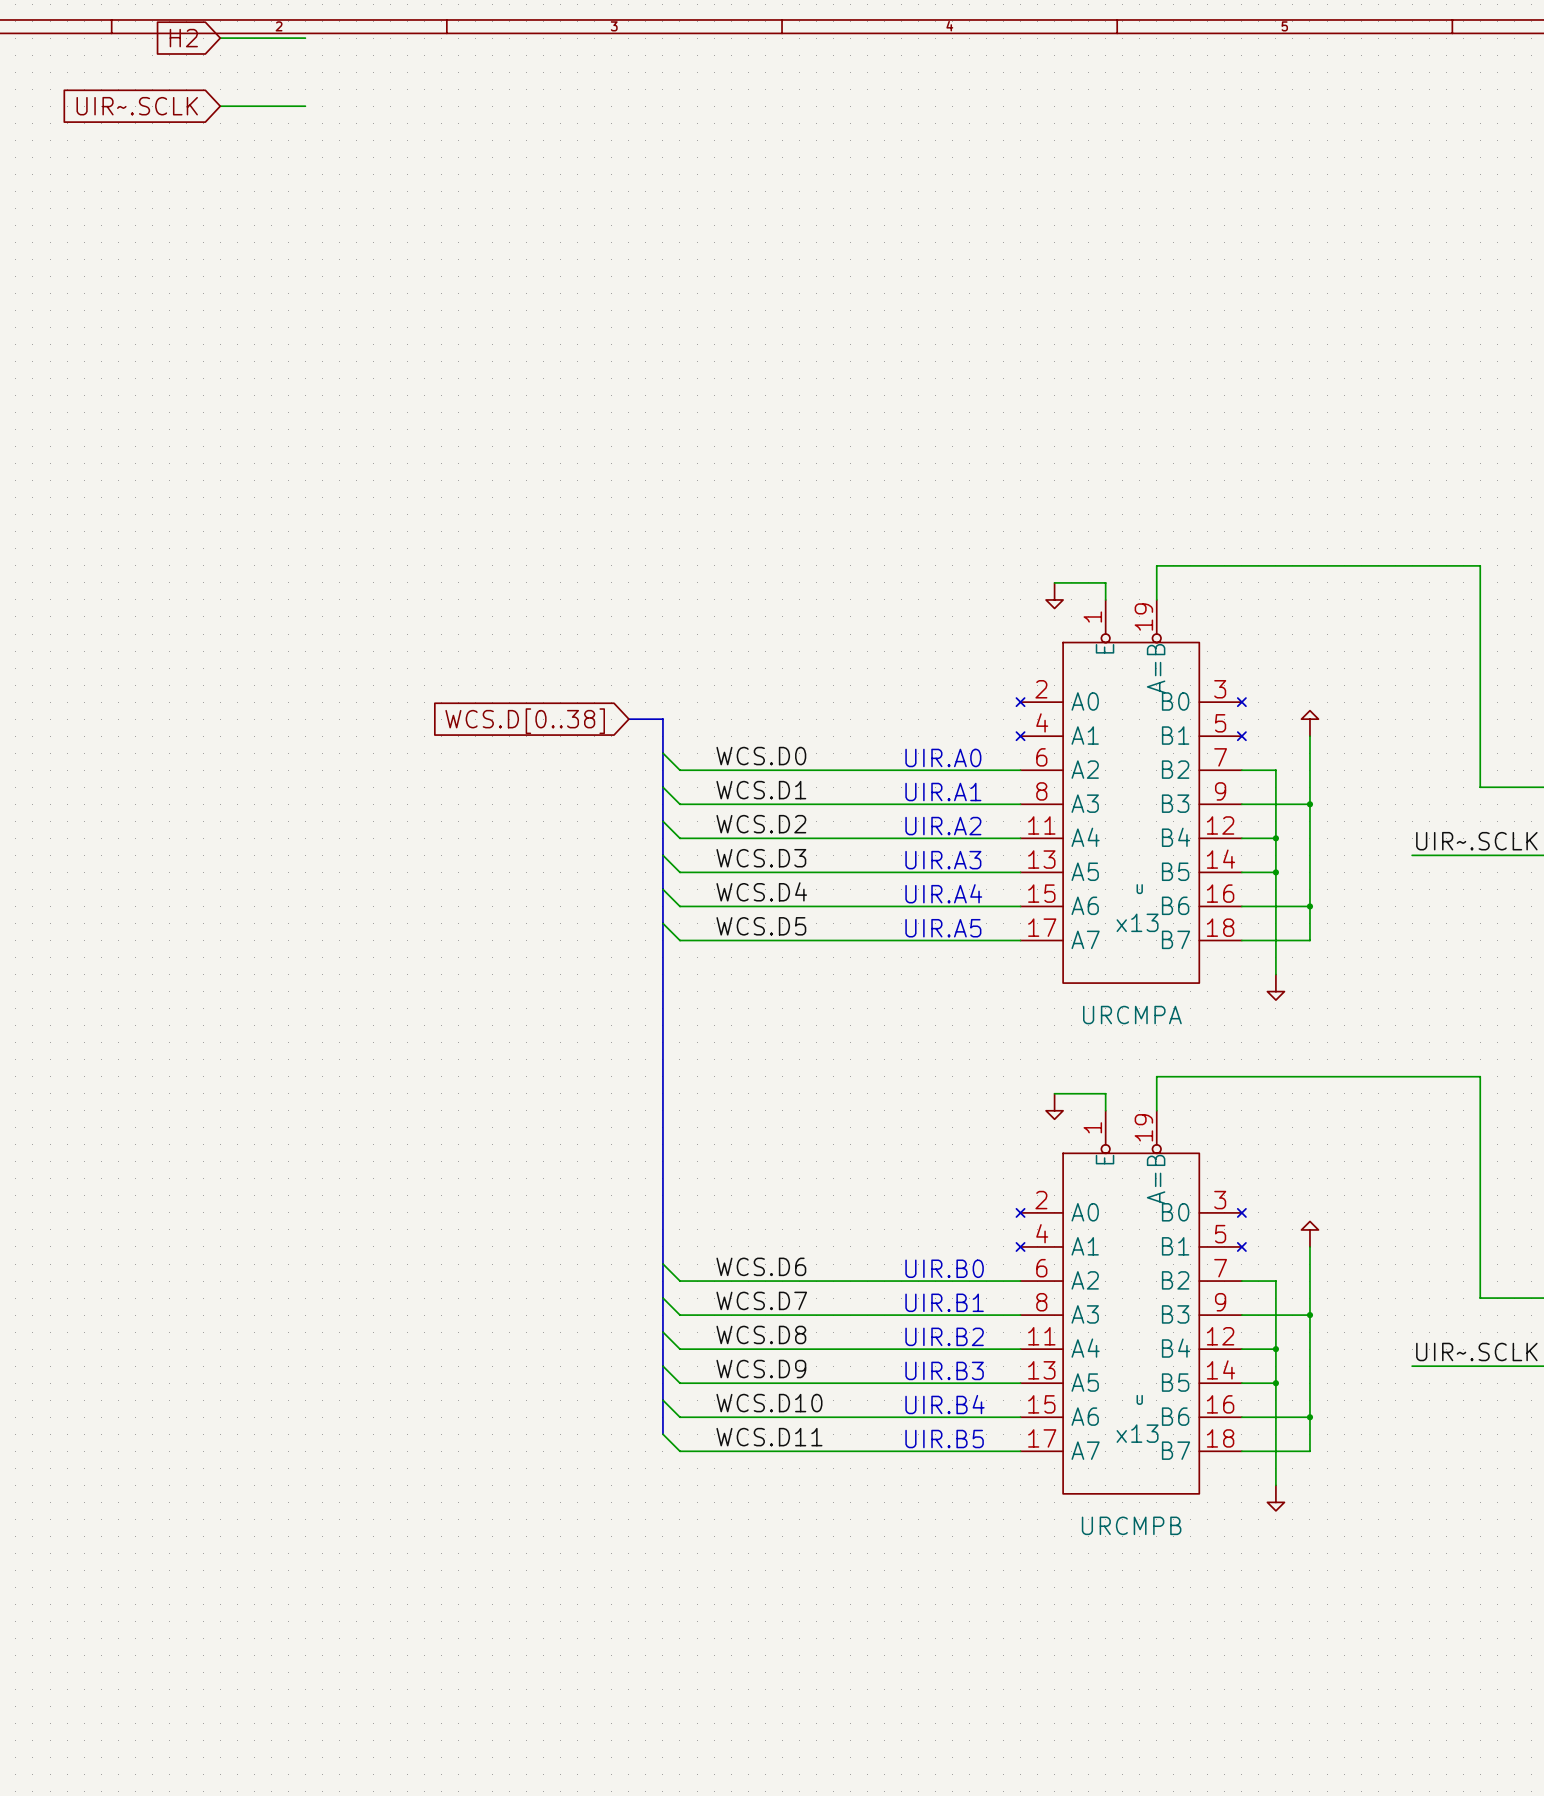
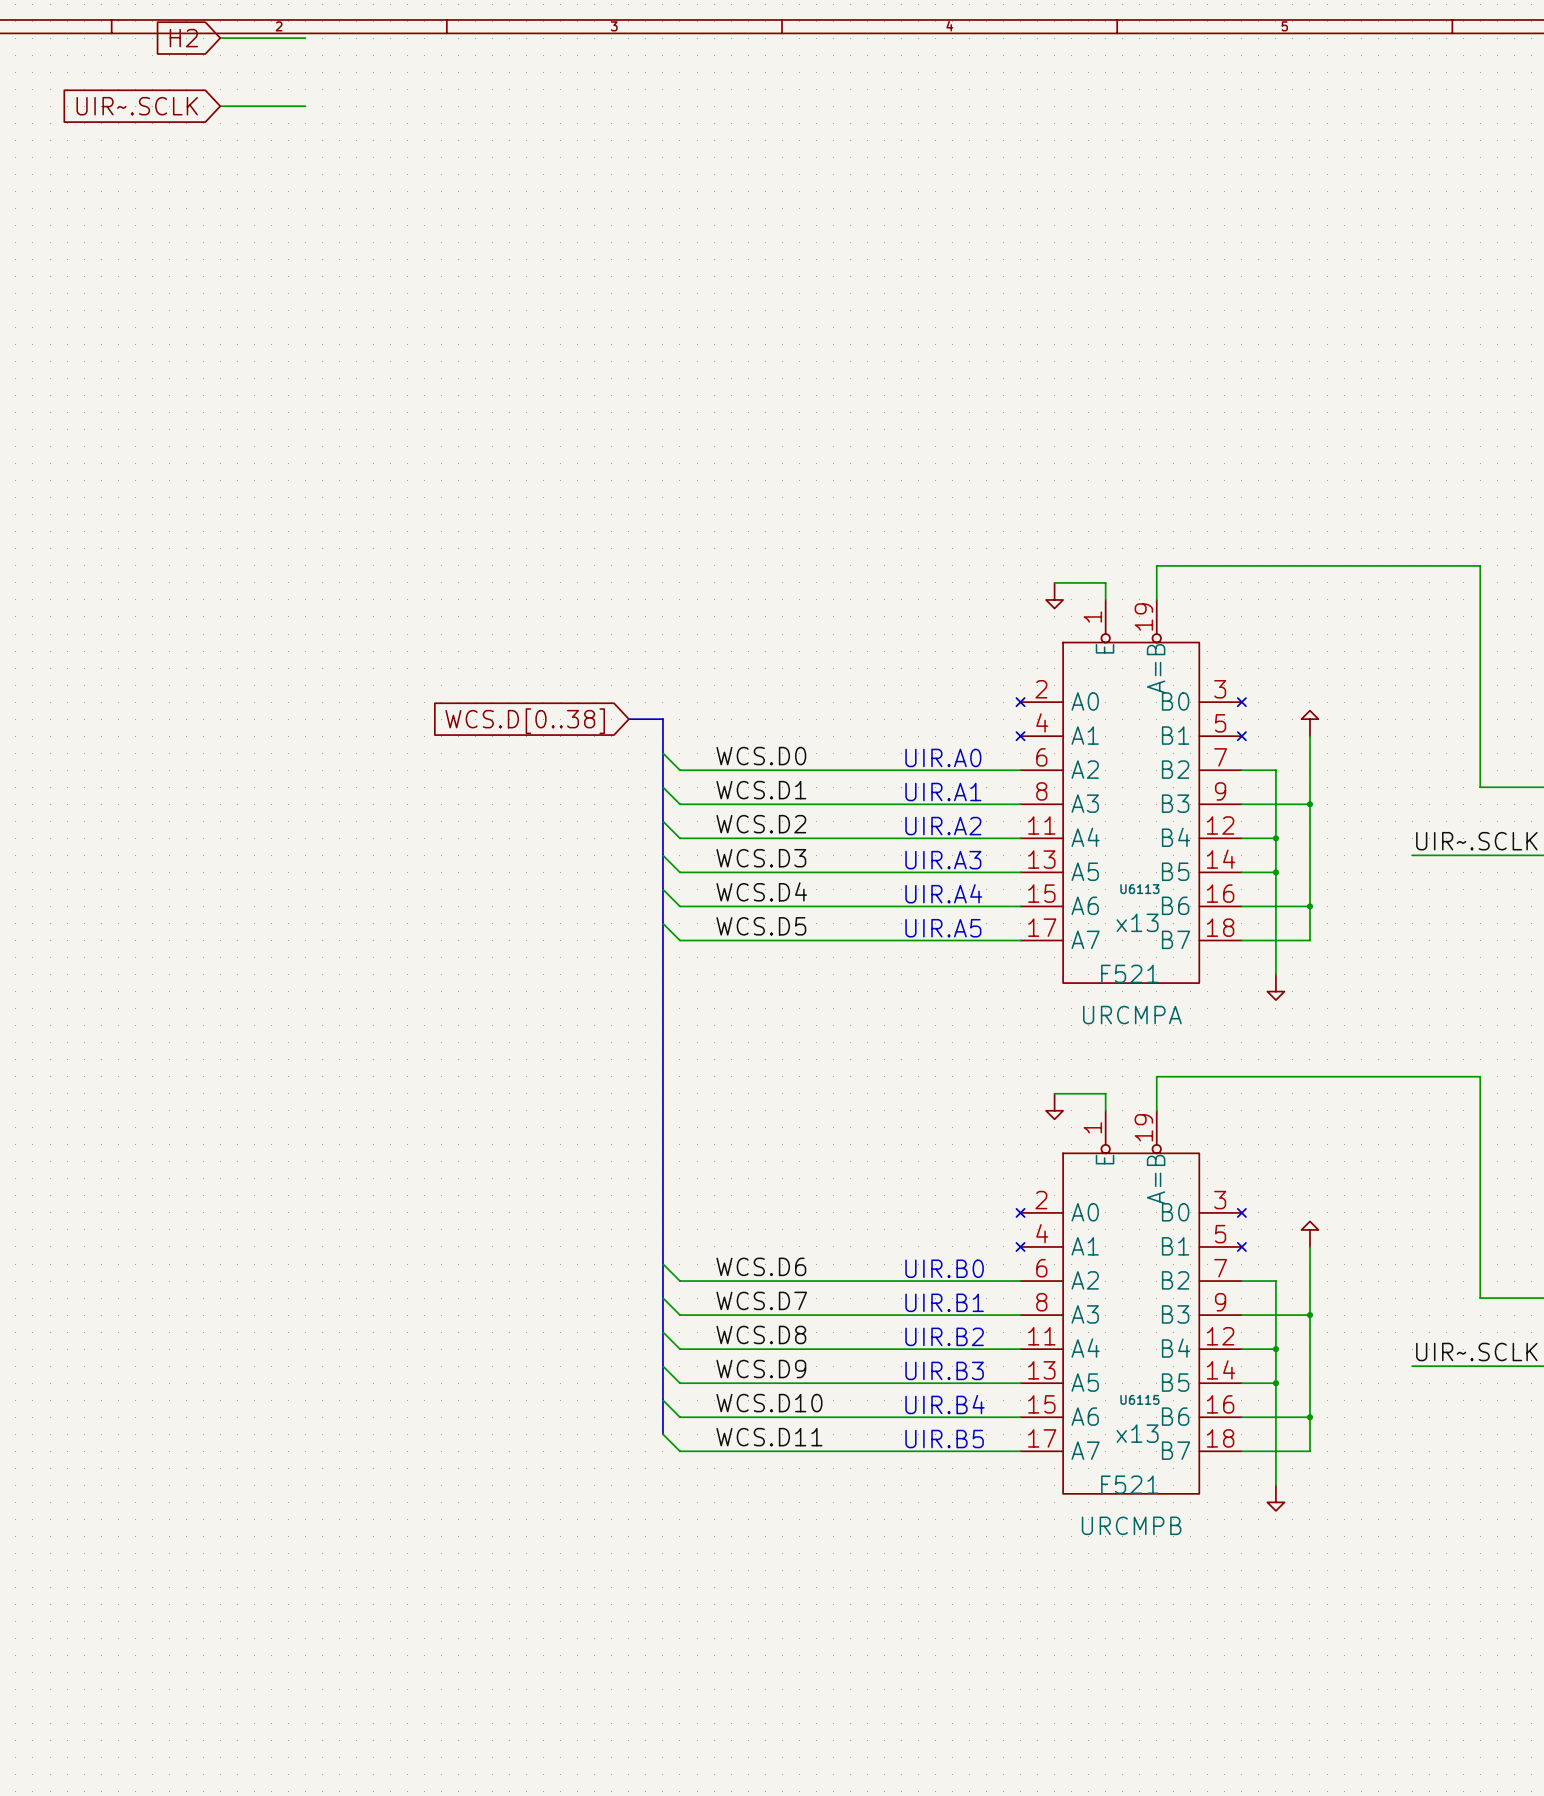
U name: U (1139, 889) -> U6113 (1139, 889)
U value: none -> F521 (1129, 973)
U name: U (1139, 1399) -> U6115 (1139, 1399)
U value: none -> F521 (1129, 1484)

